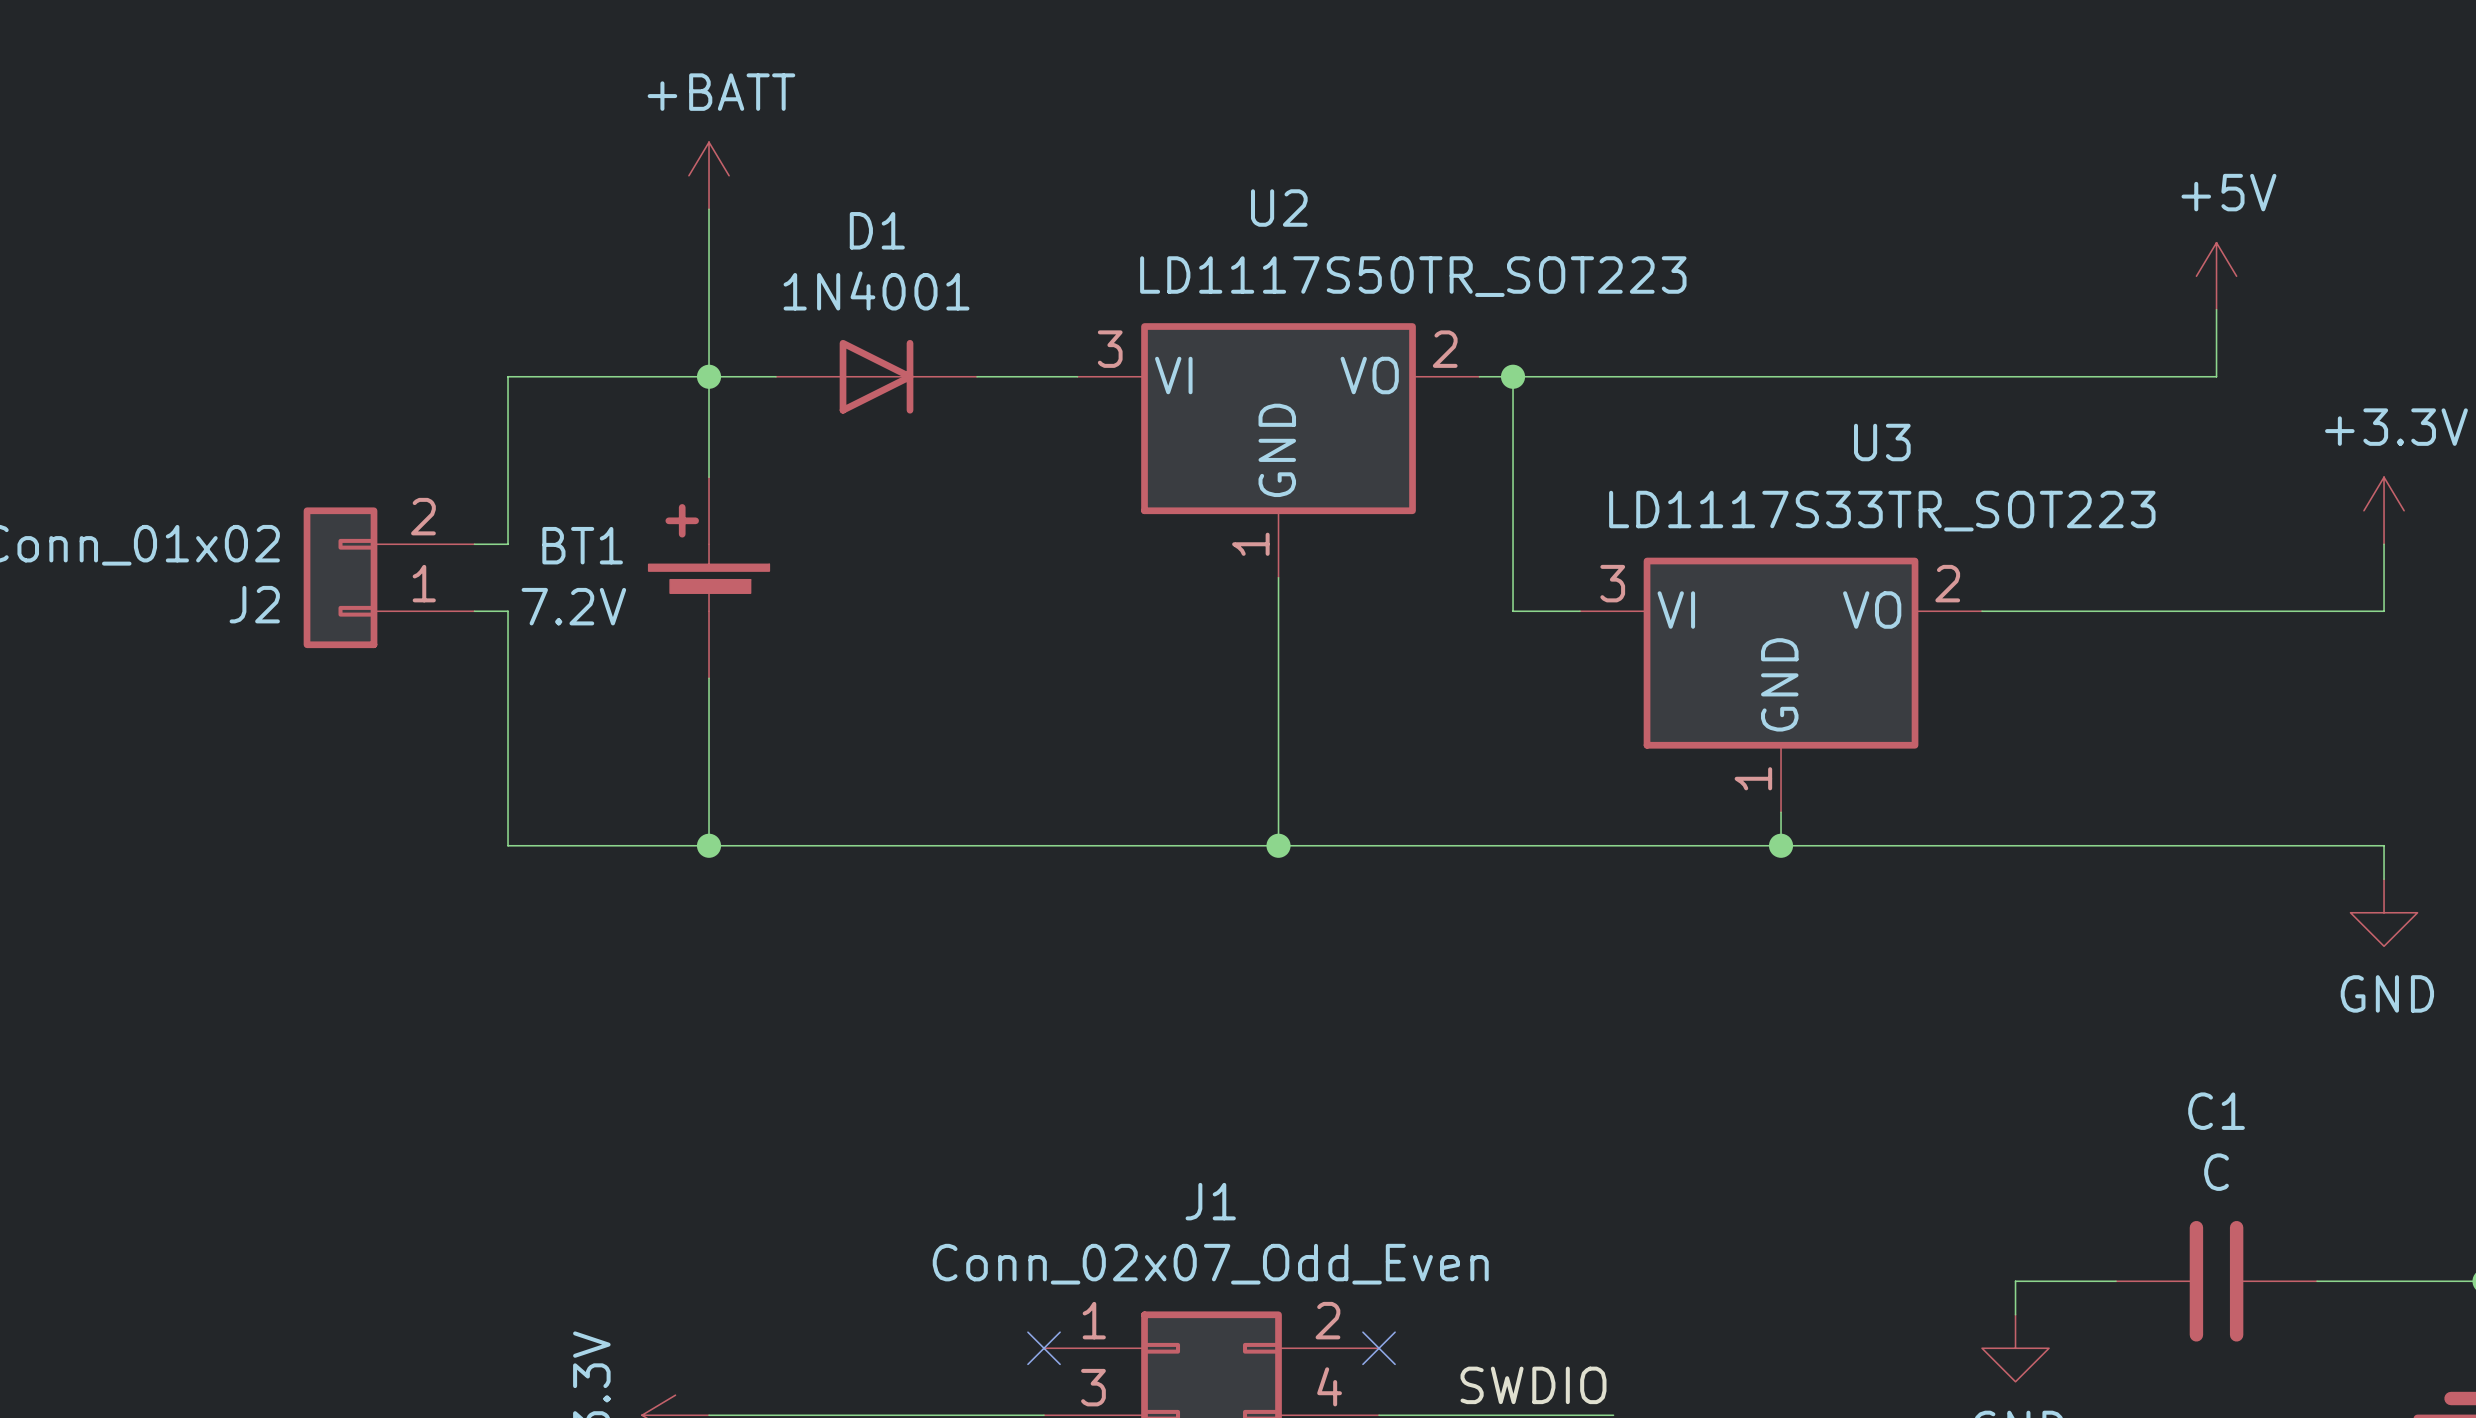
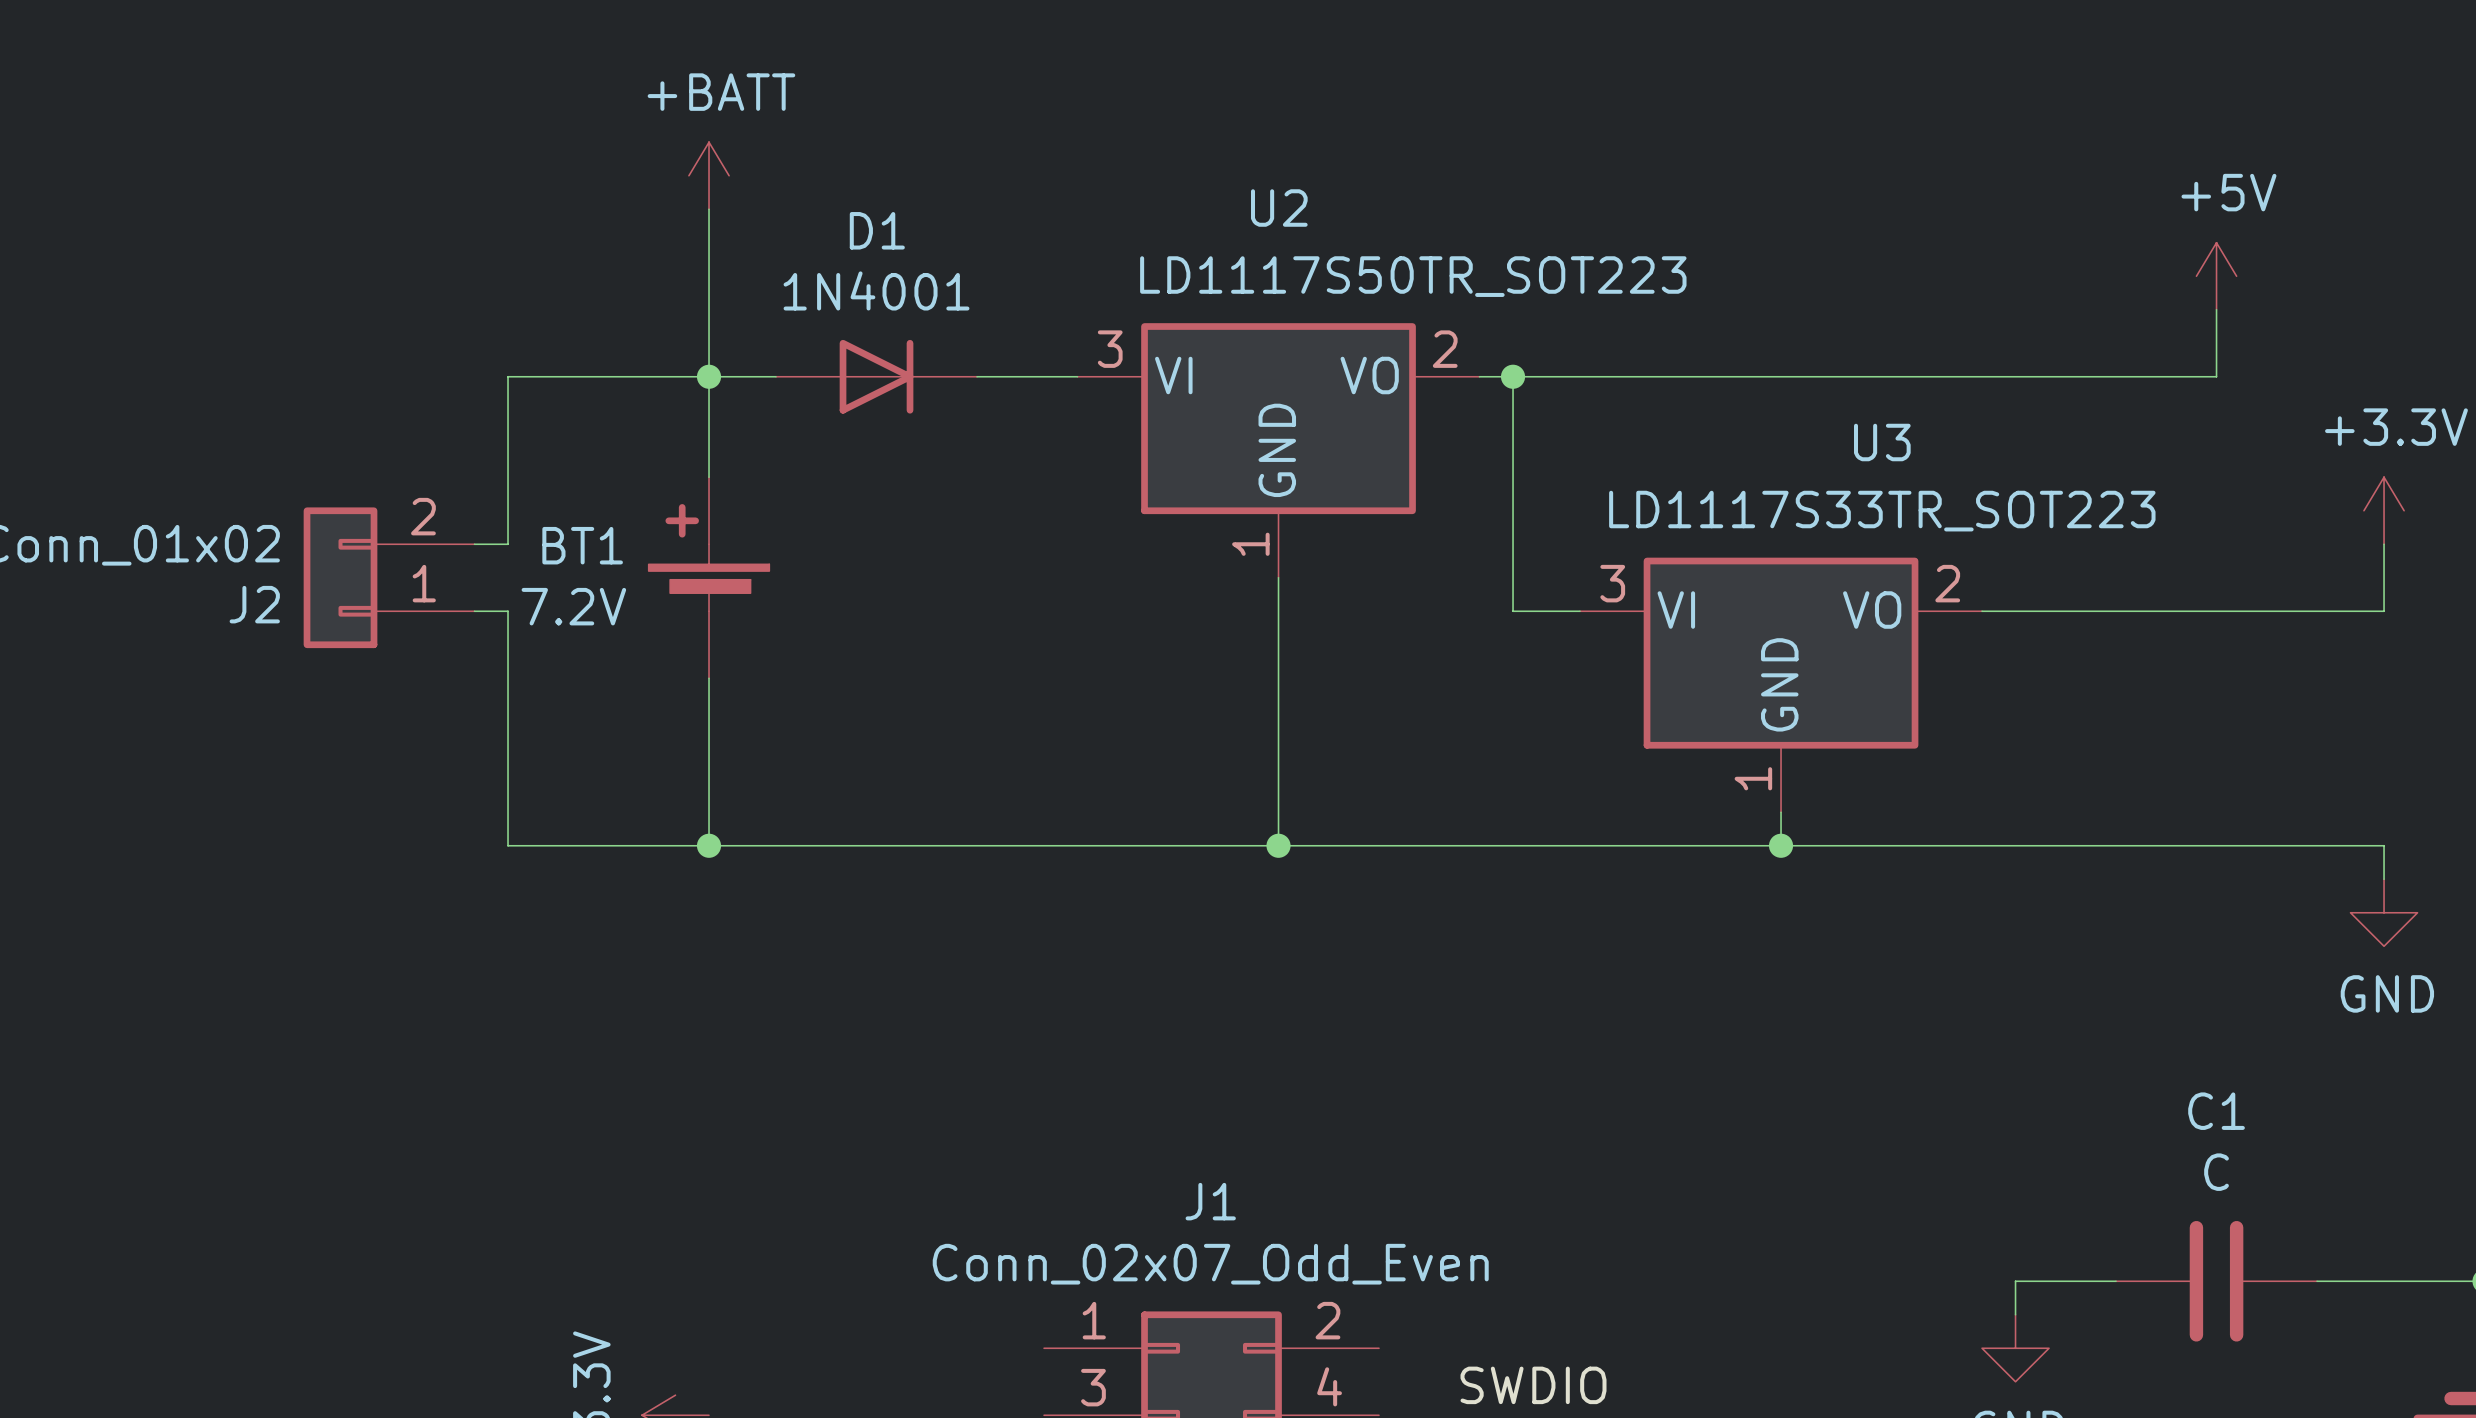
no-connect mark: (1044, 1348) -> none
no-connect mark: (1379, 1348) -> none
wire: (709, 1415) (1044, 1415) -> none
wire: (1379, 1415) (1613, 1415) -> none

